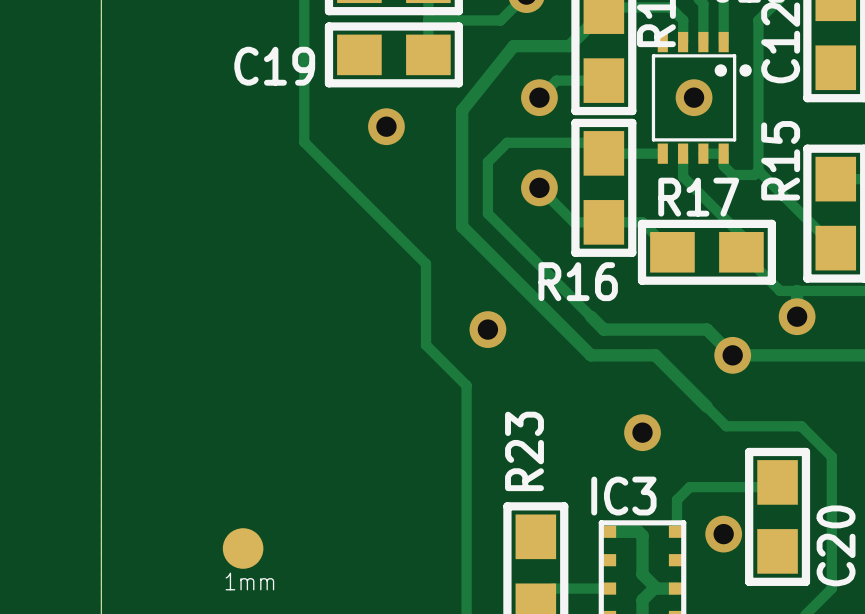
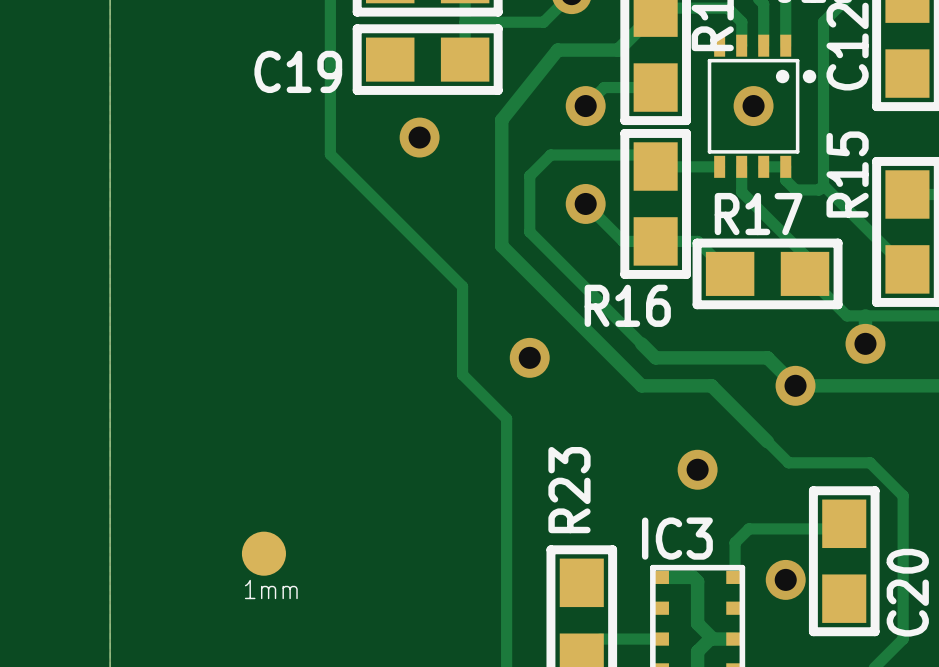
part position: (243, 548) -> (263, 553)

